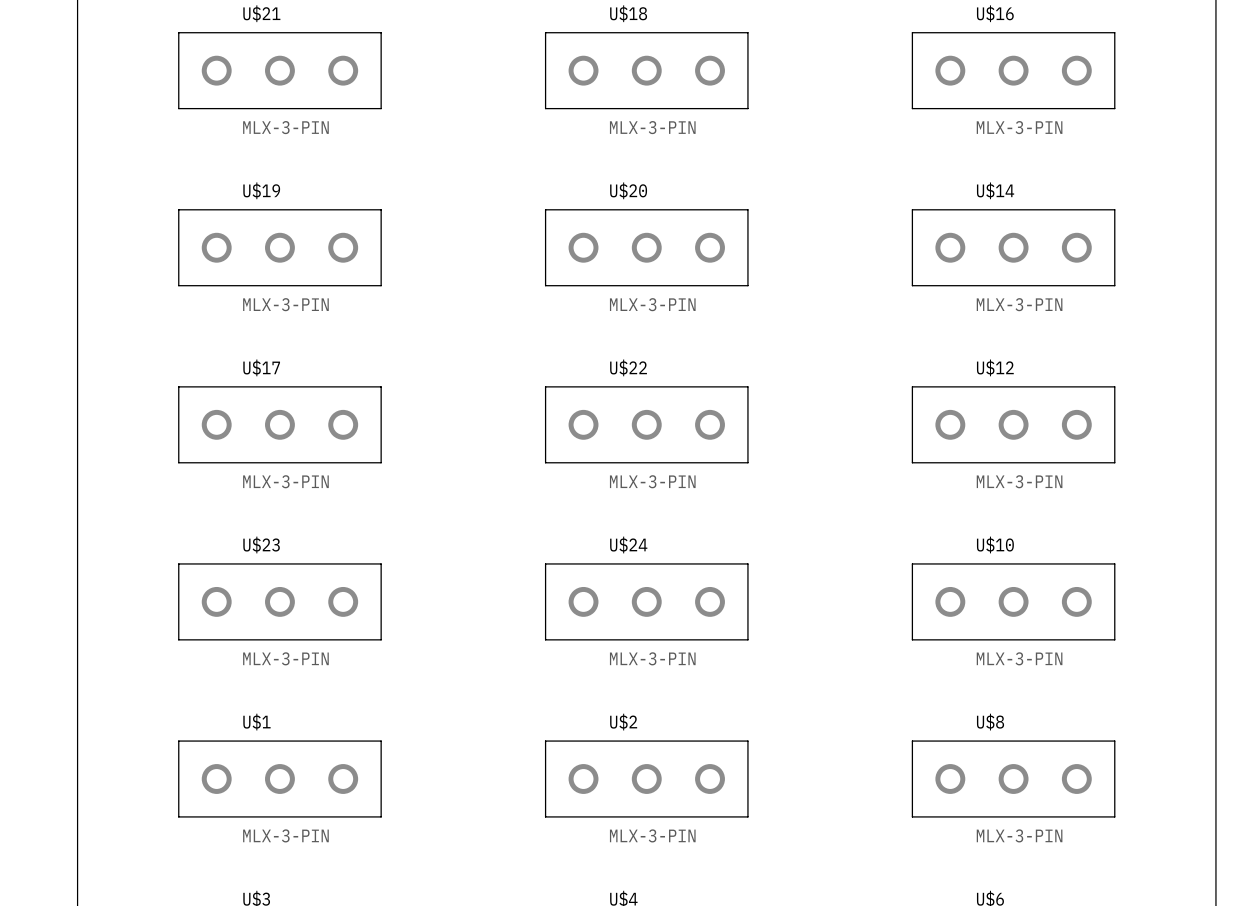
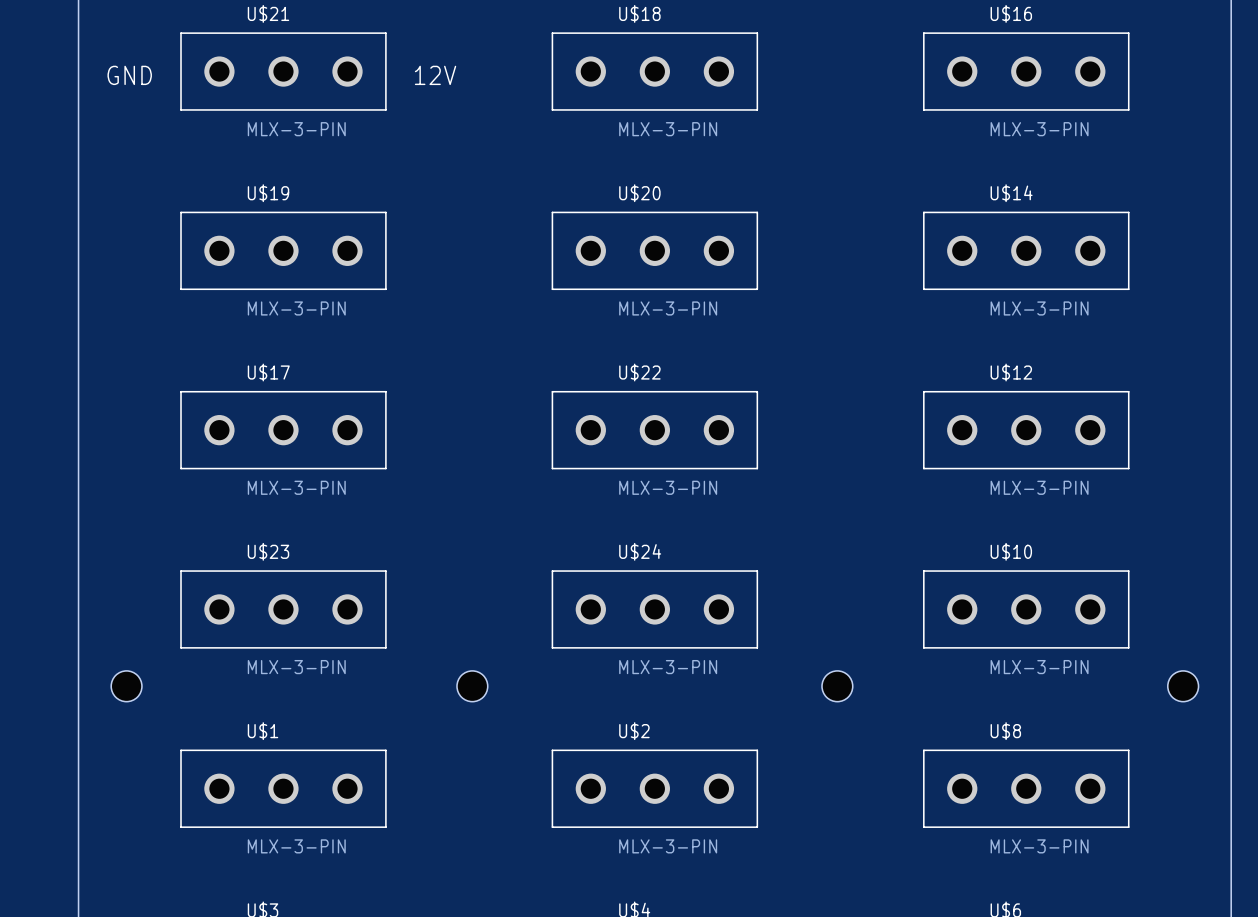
text: none -> GND (129, 75)
text: none -> 12V (435, 75)
hole: none -> (126, 686)
hole: none -> (472, 686)
hole: none -> (837, 686)
hole: none -> (1183, 686)

